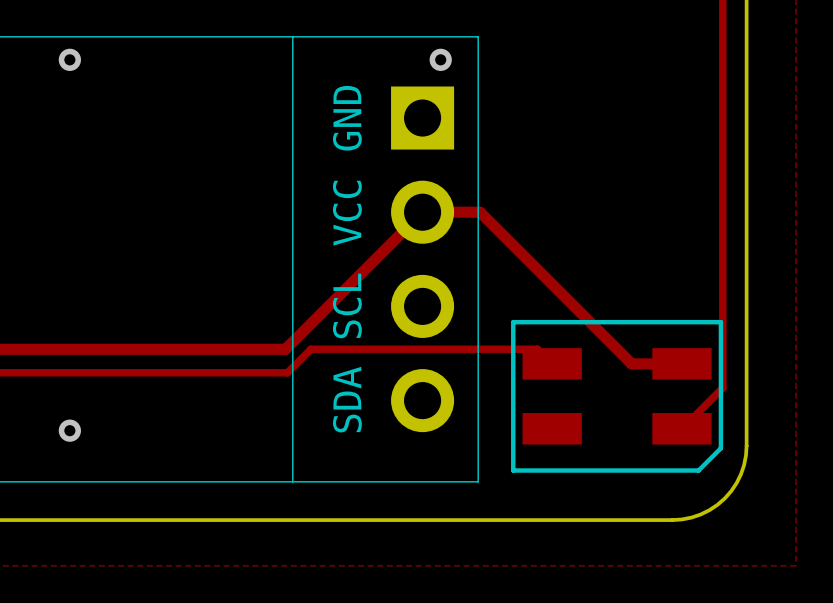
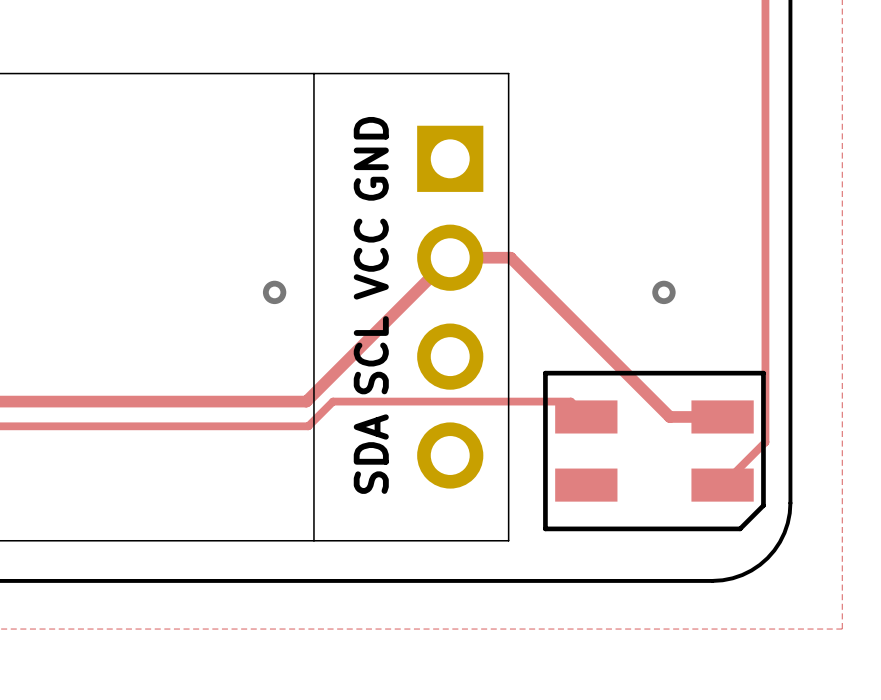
via: (69, 59) -> none
via: (440, 59) -> none
via: none -> (274, 292)
via: none -> (663, 292)
via: (69, 430) -> none

